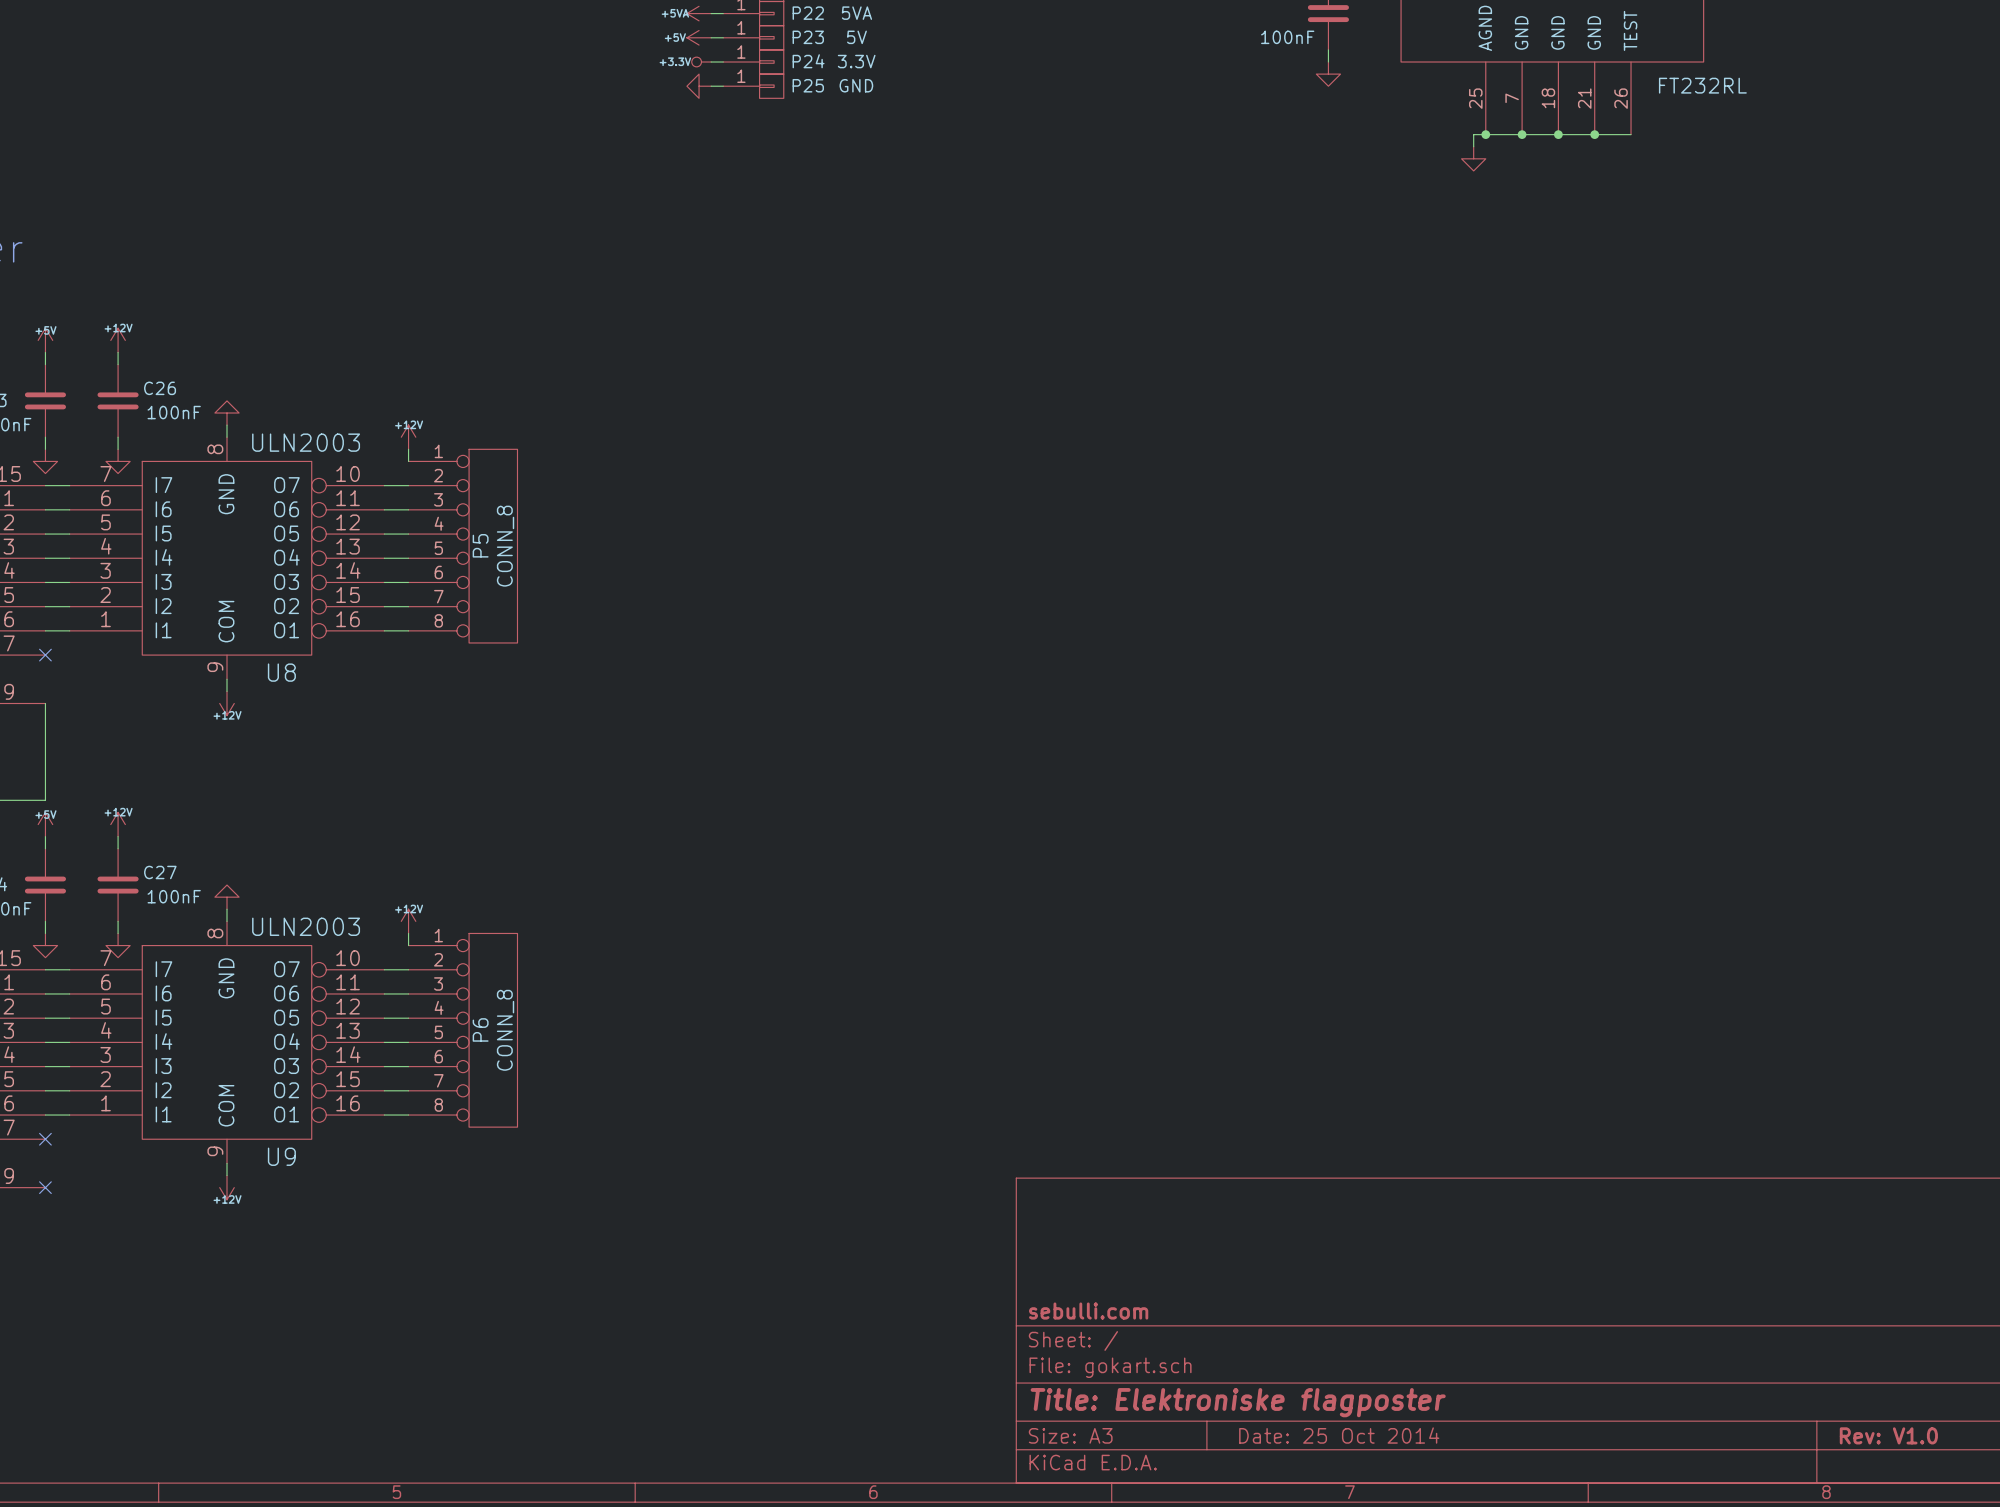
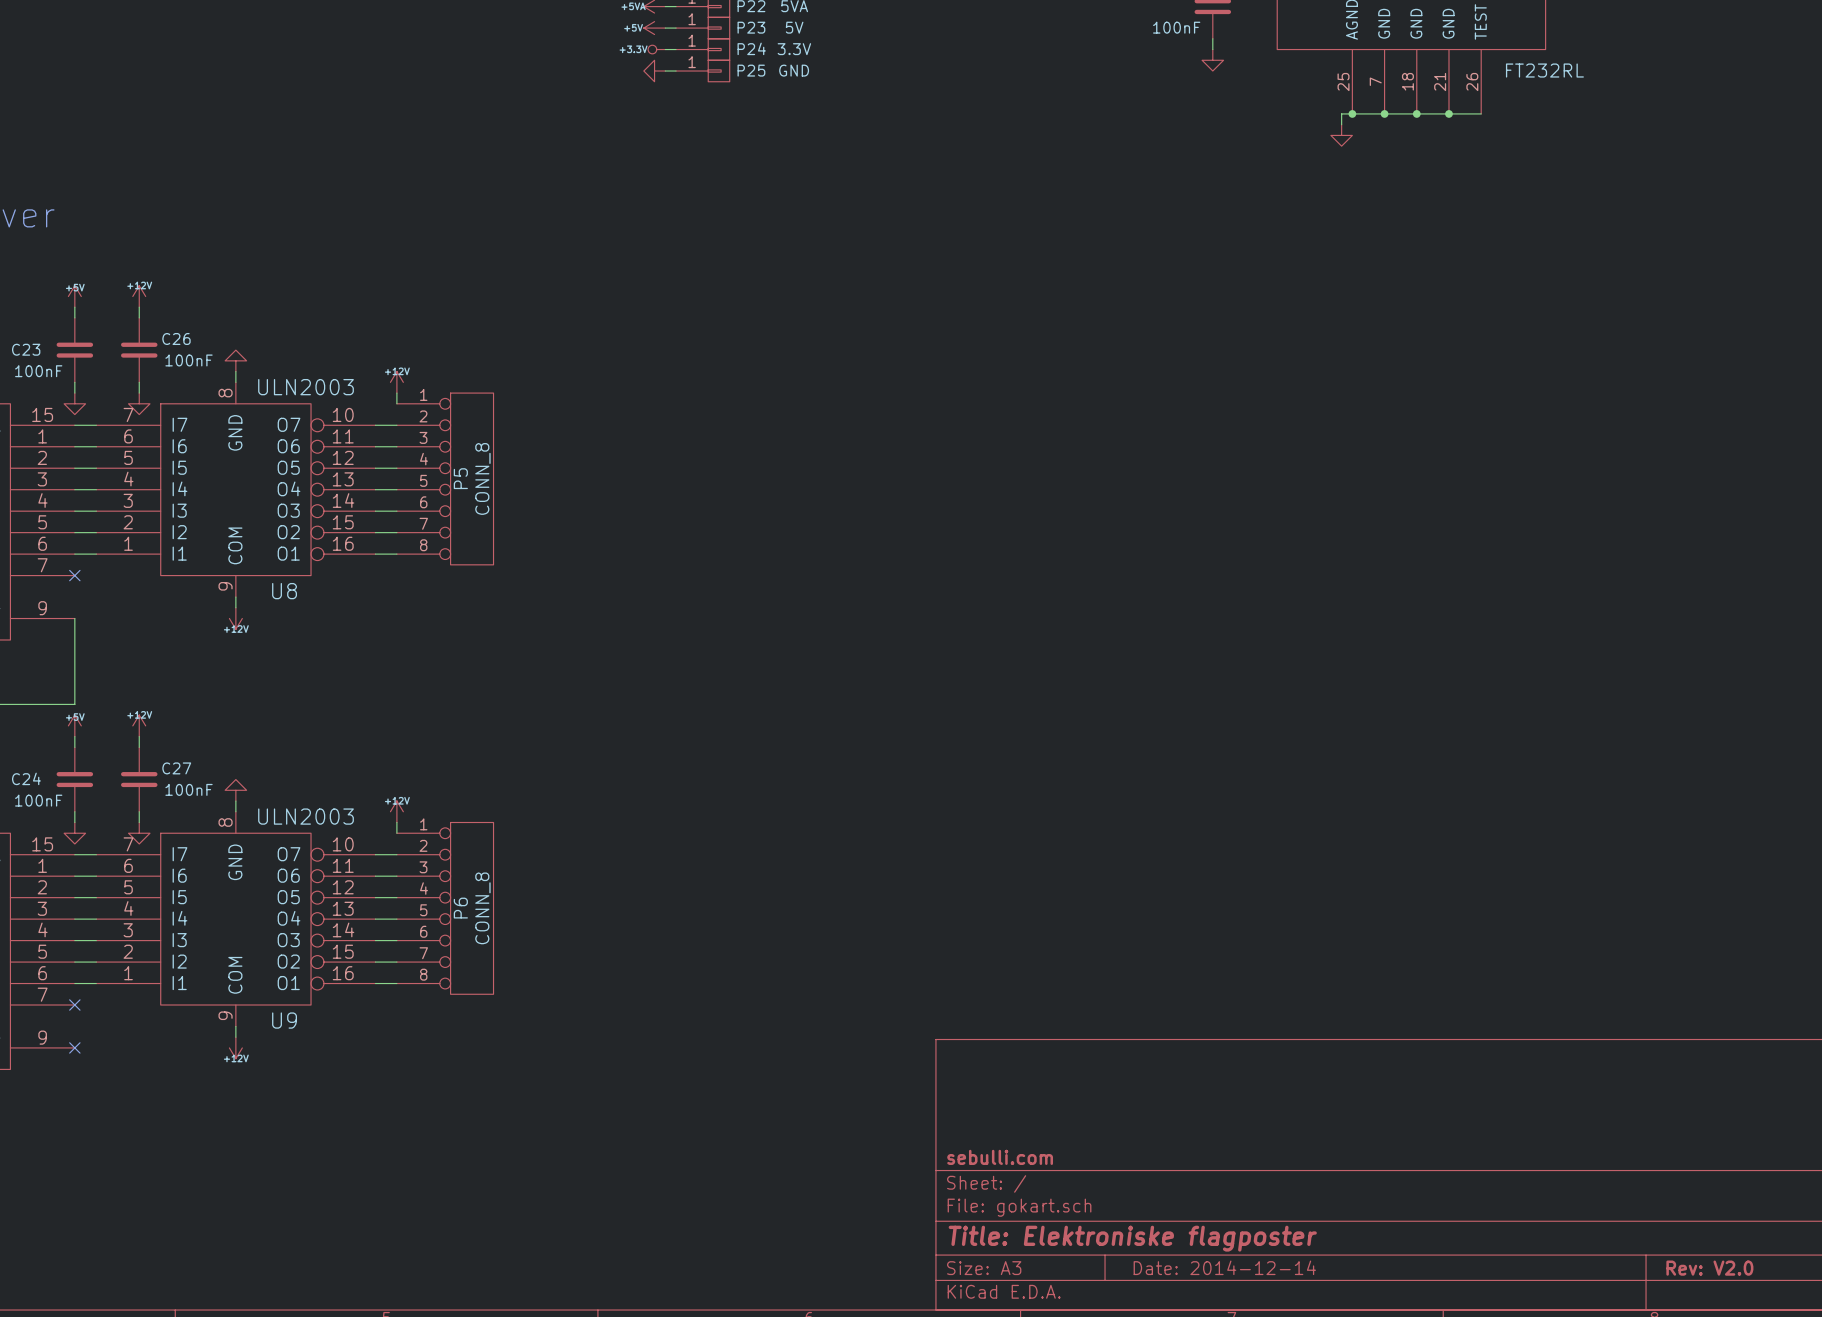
title block: Date: 25 Oct 2014 (1339, 1435) -> Date: 2014-12-14 (1224, 1267)
title block: Rev: V1.0 (1888, 1435) -> Rev: V2.0 (1709, 1268)

